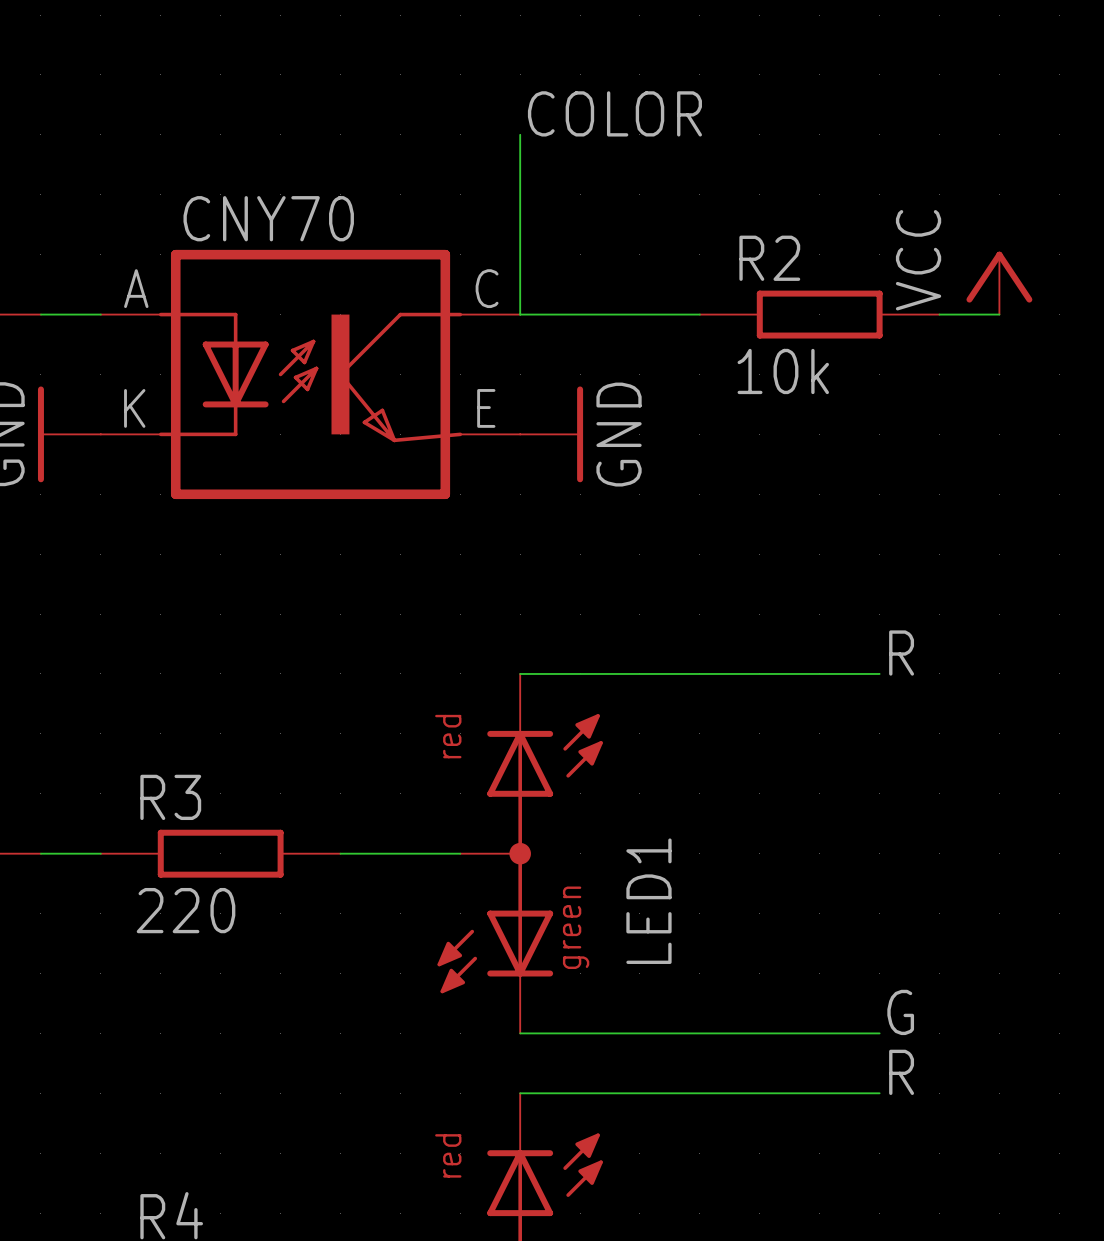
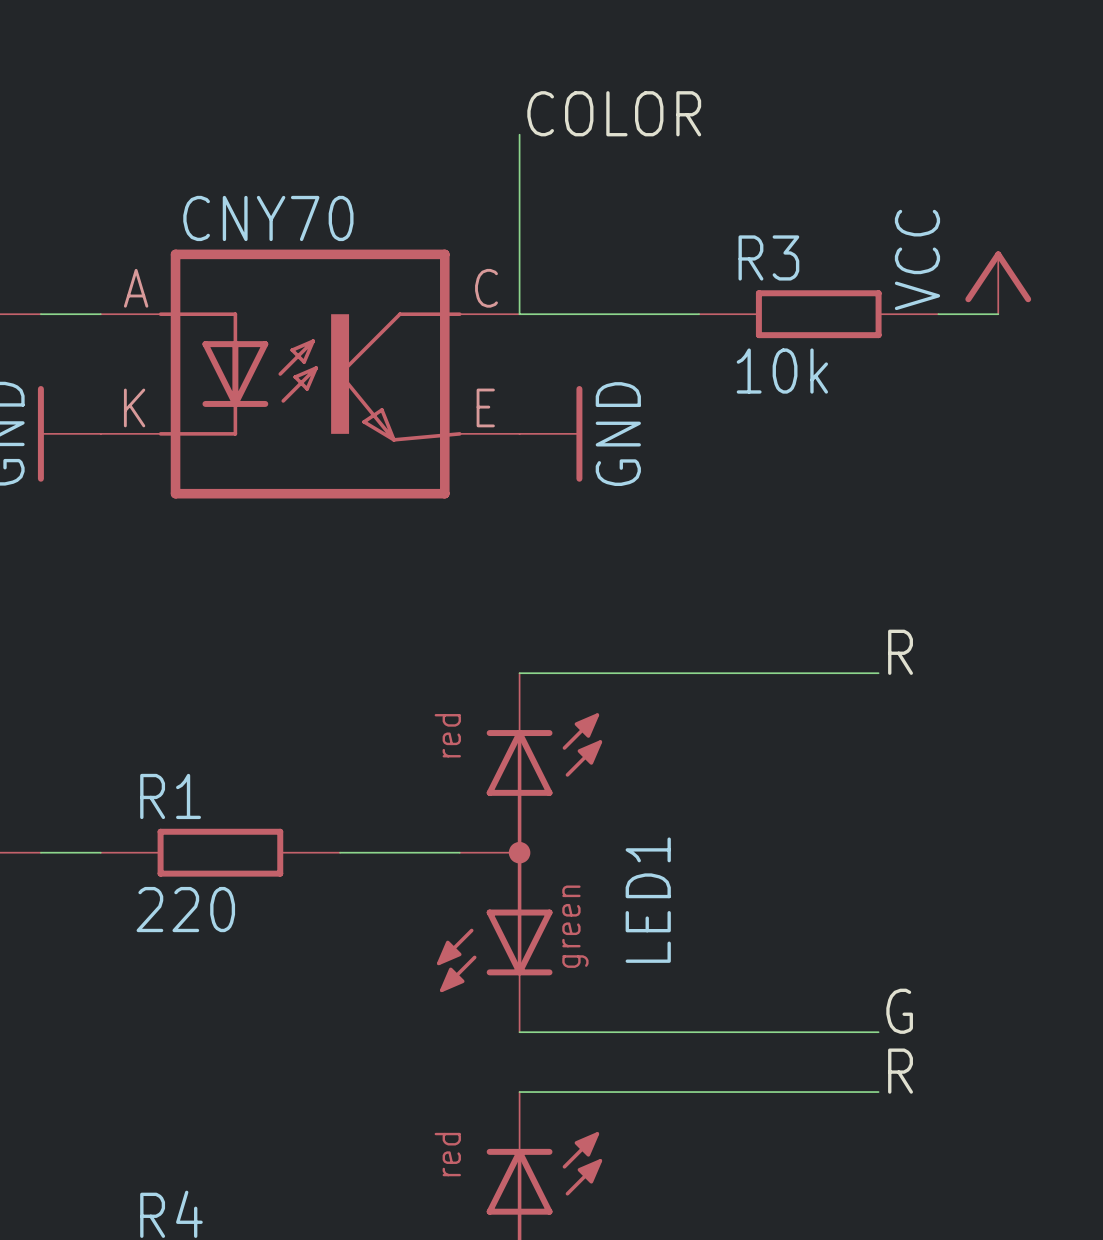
R2 name: R2 (769, 258) -> R3 (768, 257)
R3 name: R3 (170, 797) -> R1 (170, 796)

